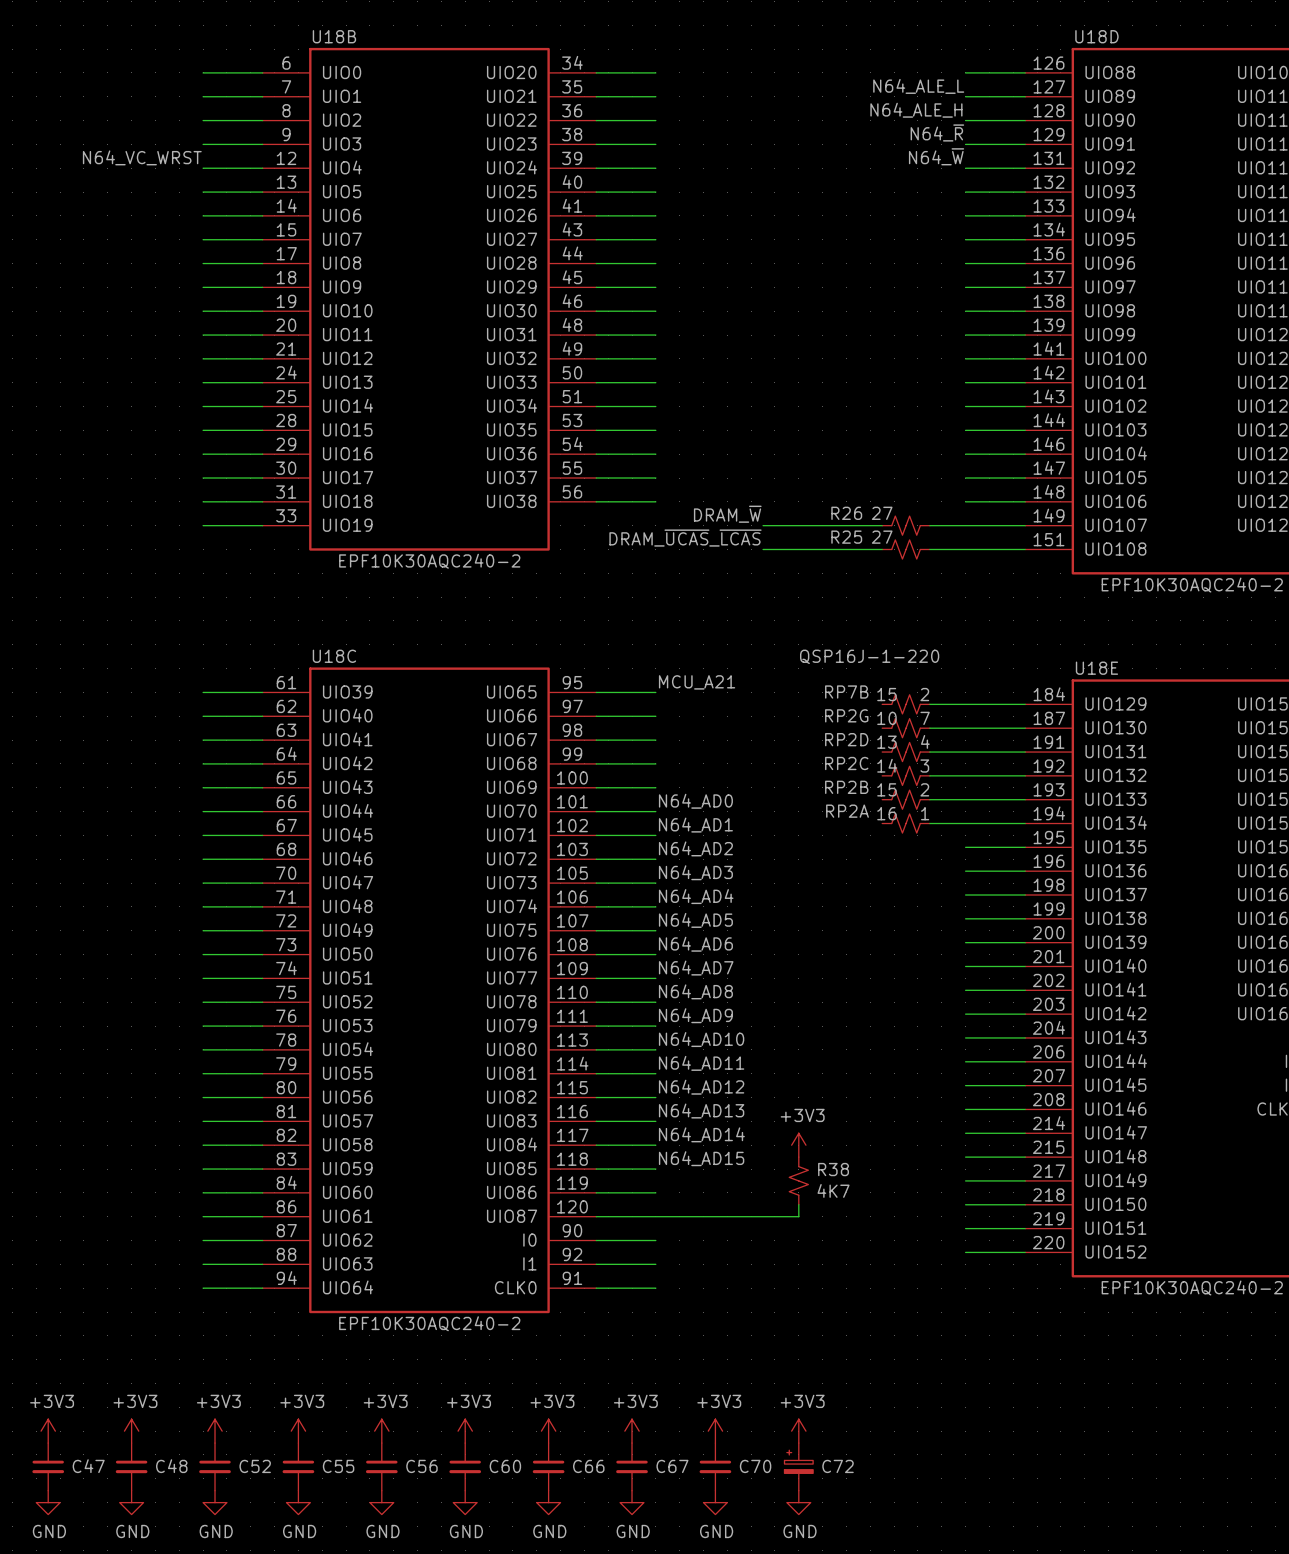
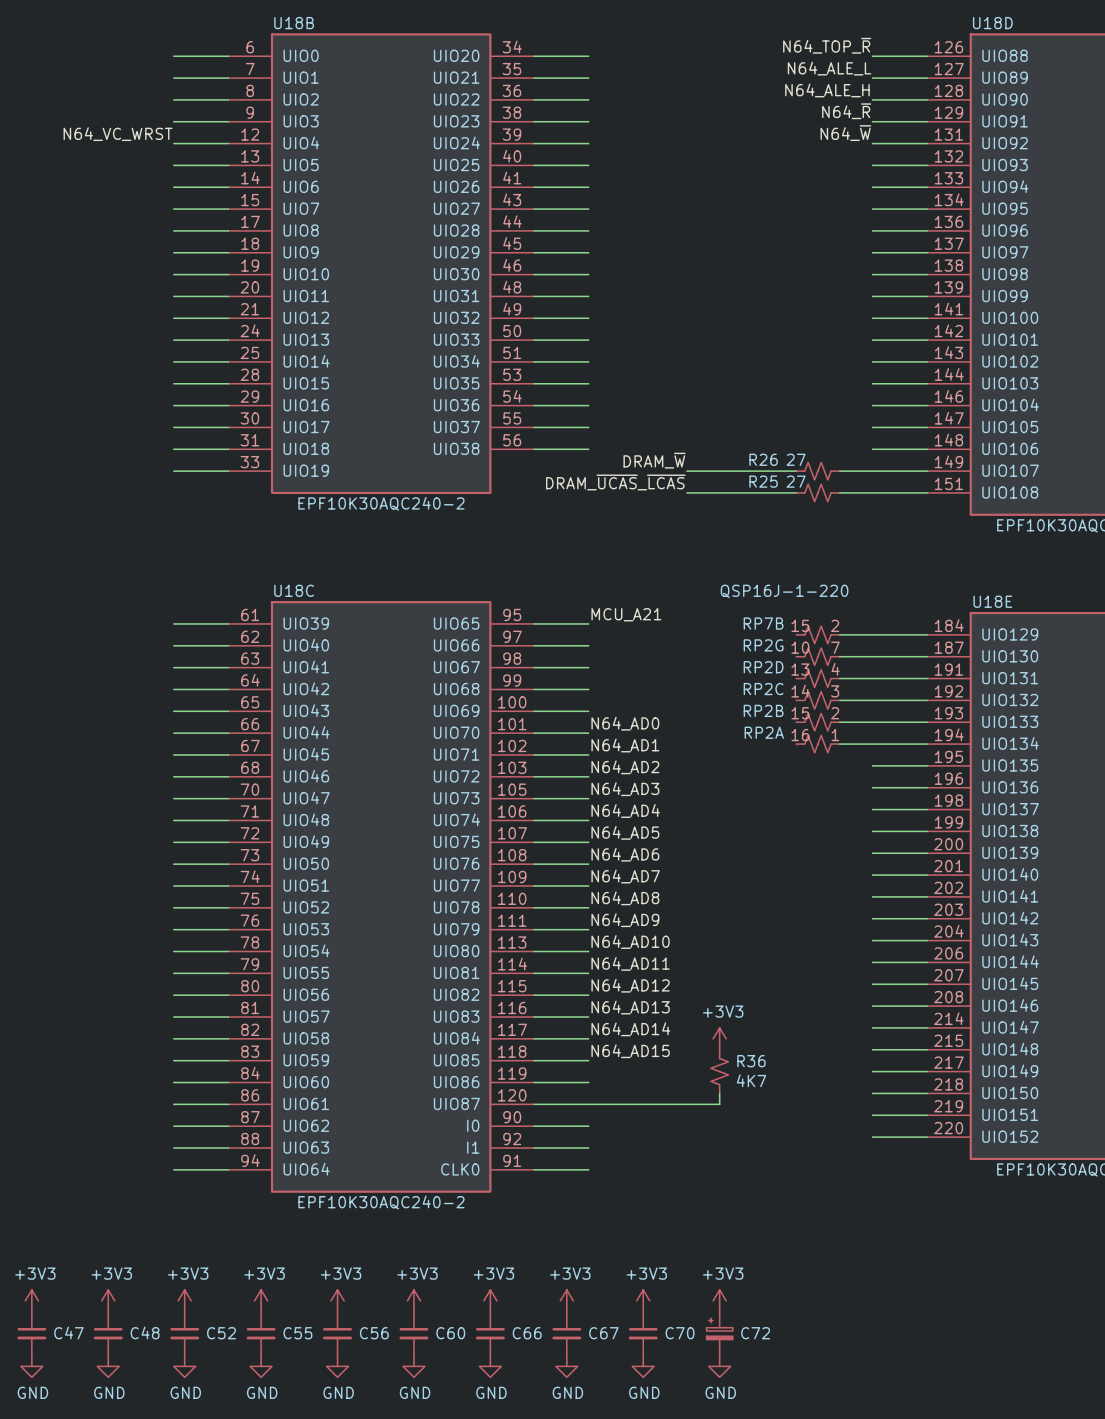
label: none -> N64_TOP_~{R} (827, 45)
R38 name: R38 (833, 1169) -> R36 (751, 1061)

